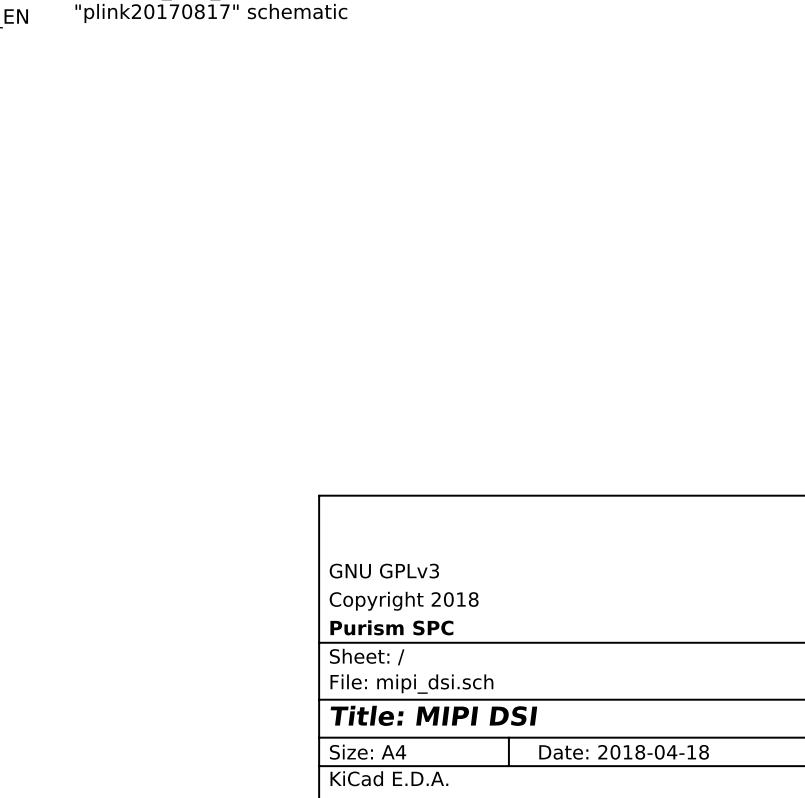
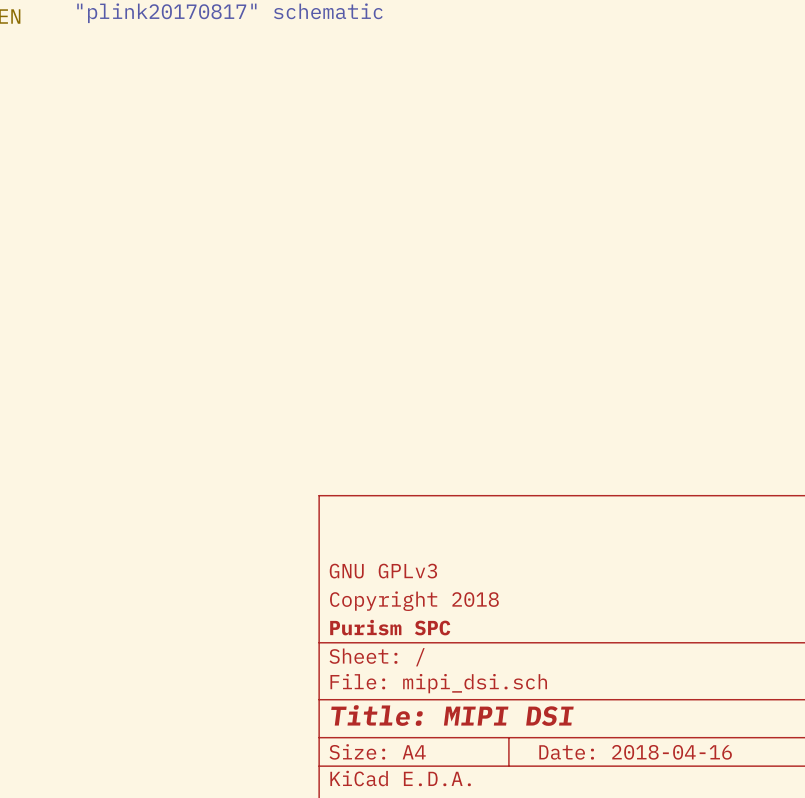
title block: Date: 2018-04-18 (624, 752) -> Date: 2018-04-16 (635, 752)

